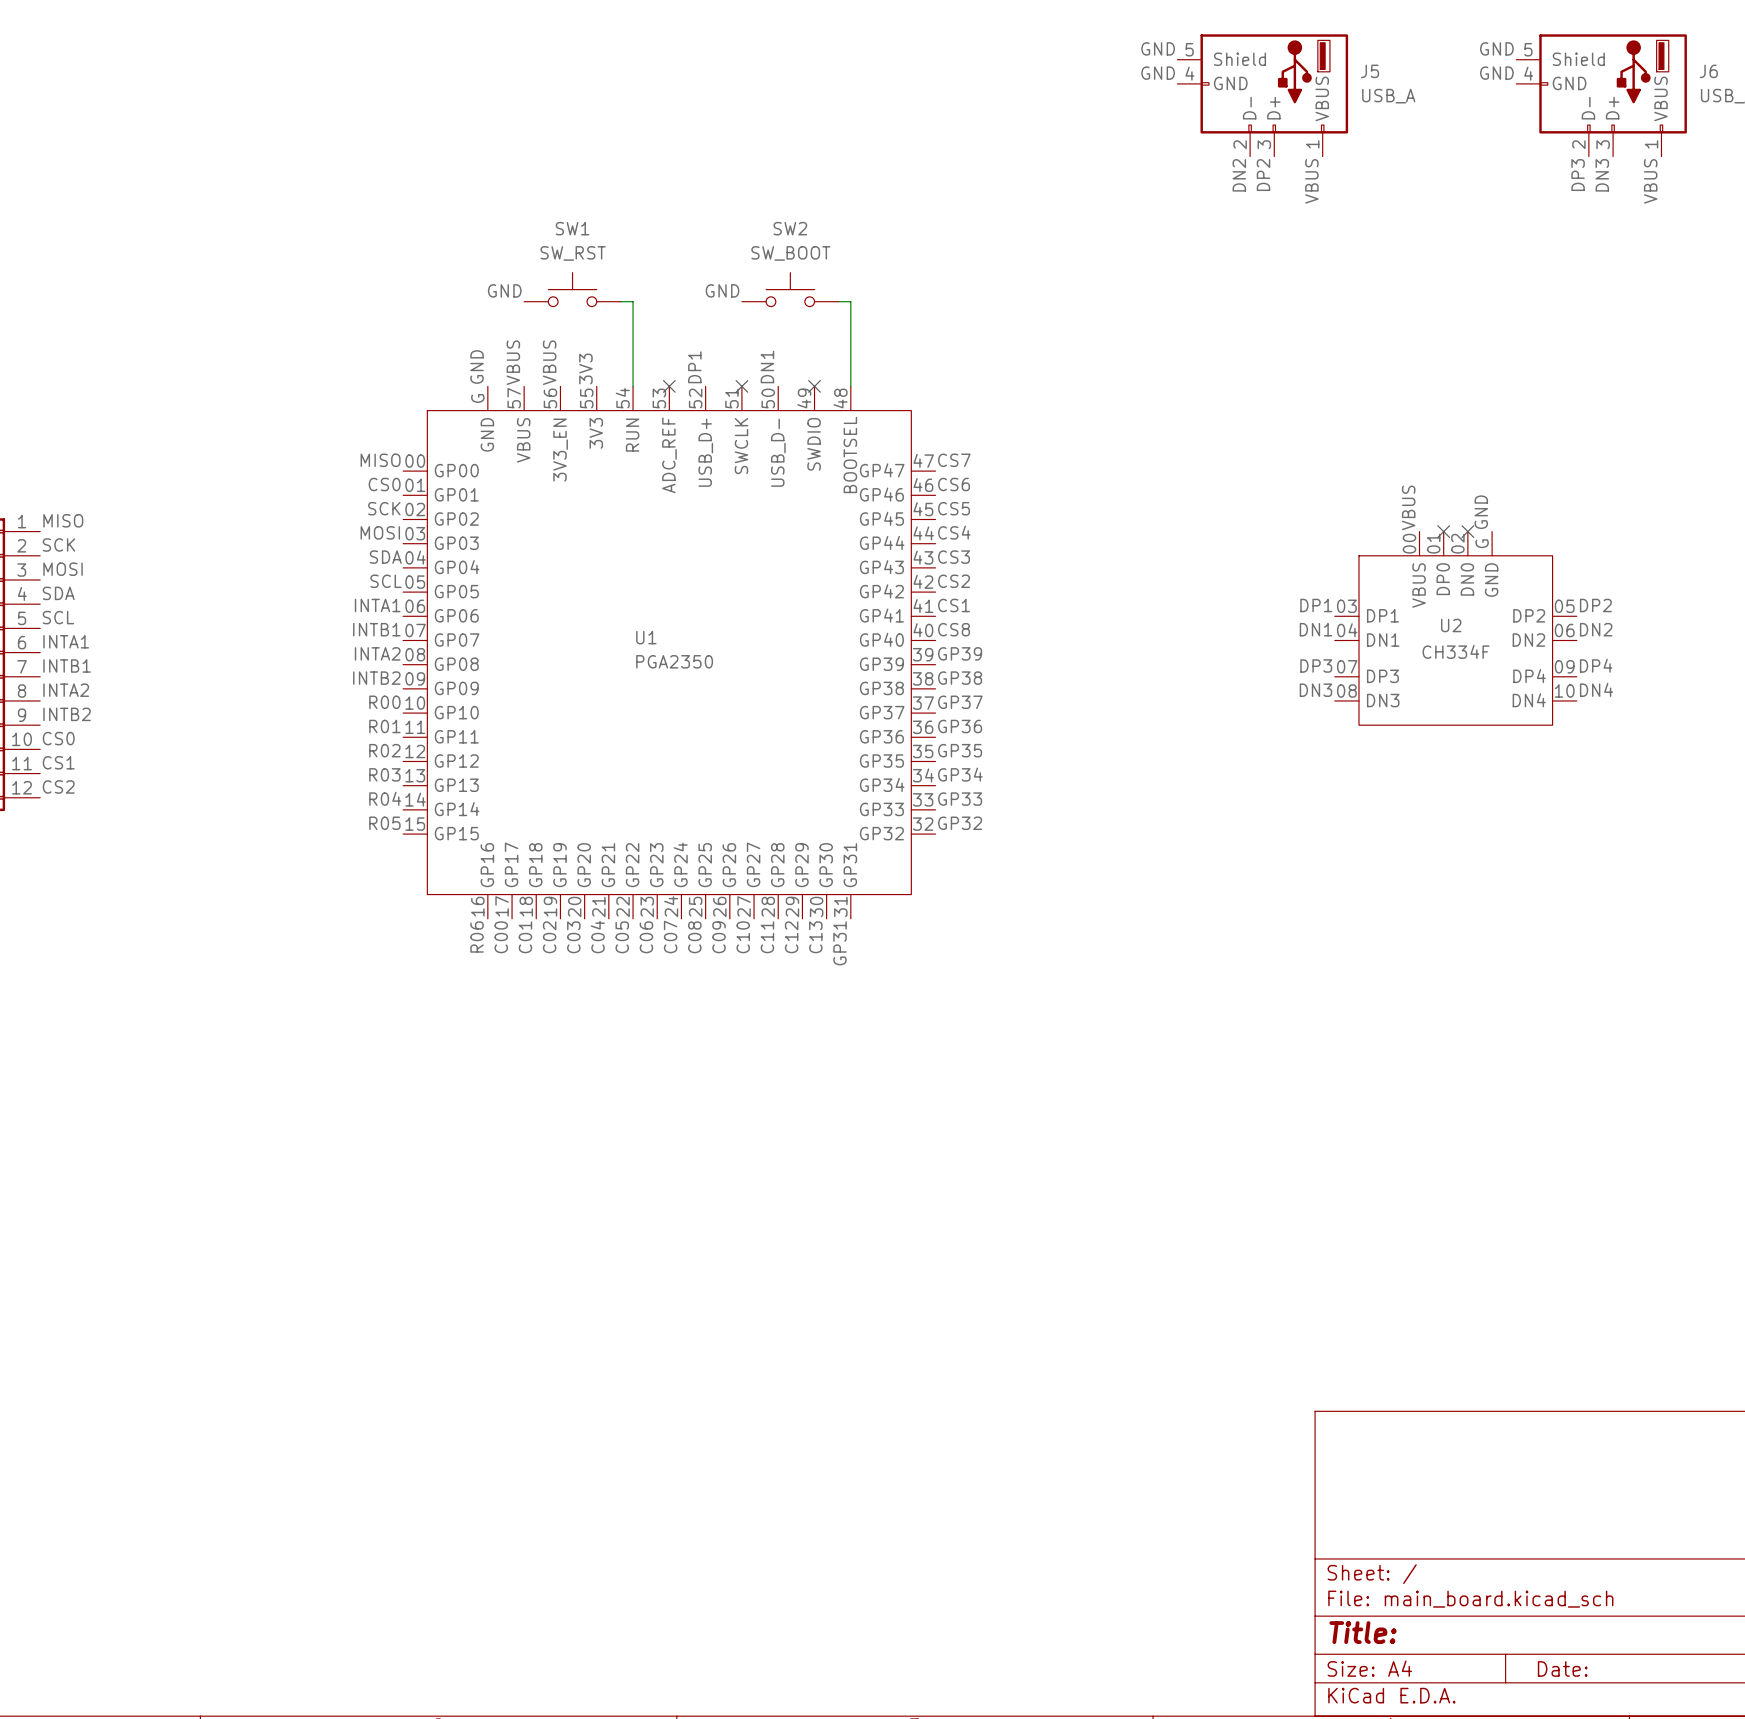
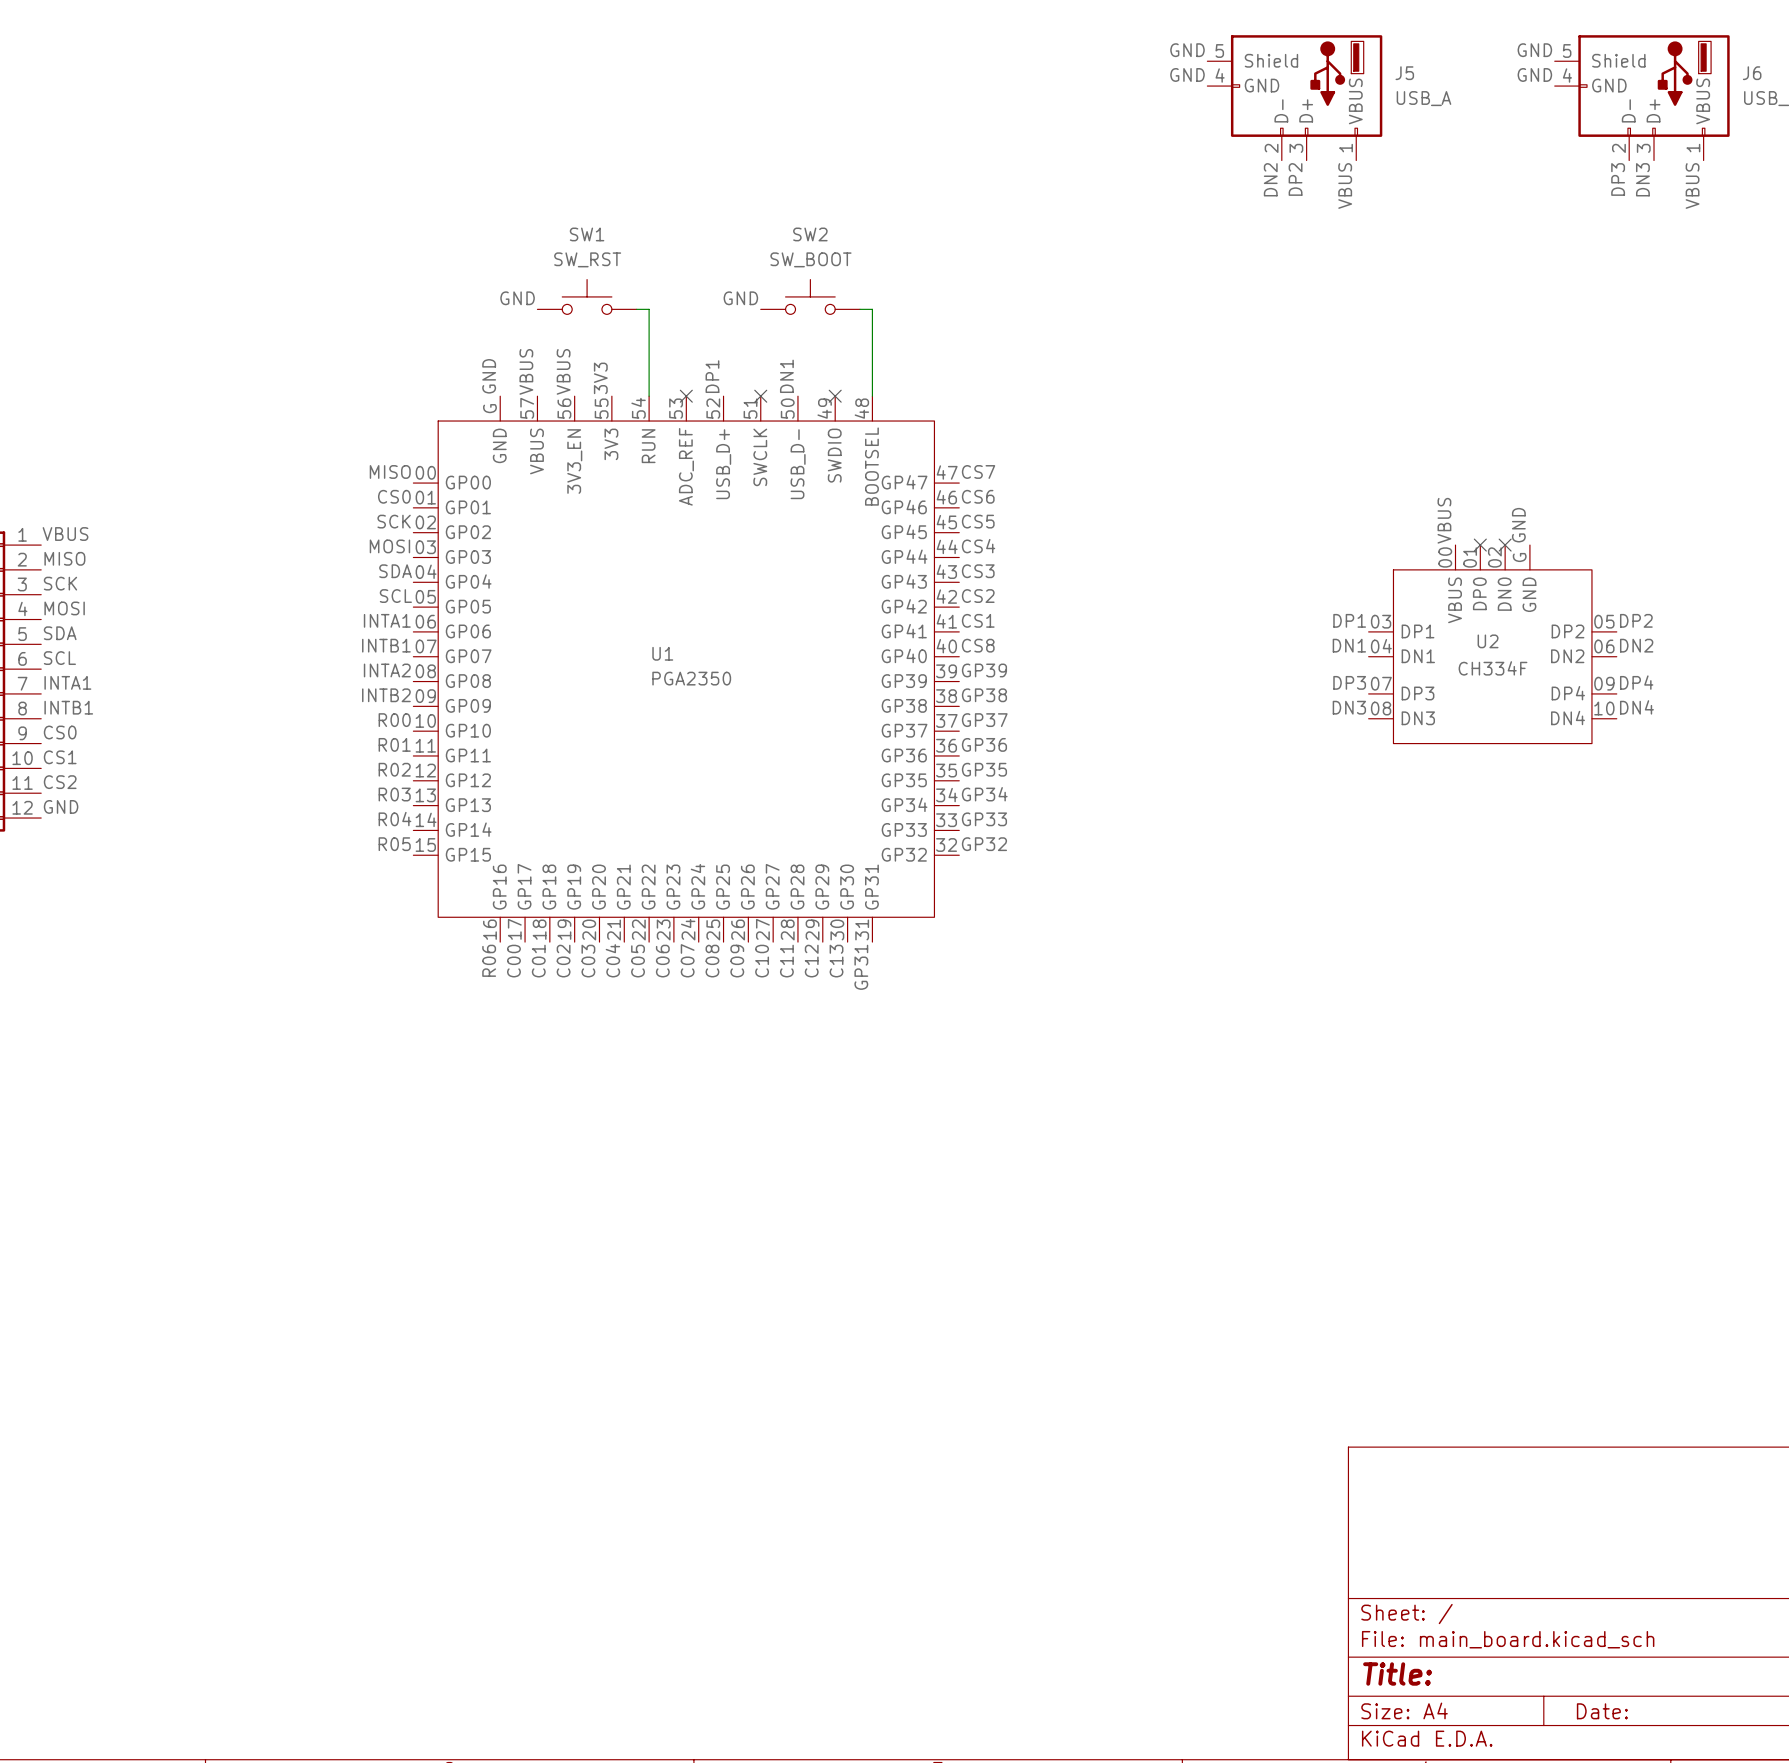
label: MISO (63, 520) -> VBUS (65, 534)
label: SCK (58, 544) -> MISO (64, 558)
label: MOSI (63, 569) -> SCK (60, 583)
label: SDA (58, 593) -> MOSI (64, 608)
label: SCL (58, 617) -> SDA (60, 633)
label: INTA1 (66, 641) -> SCL (59, 658)
label: INTB1 (67, 665) -> INTA1 (67, 682)
label: INTA2 (66, 690) -> INTB1 (68, 707)
label: INTB2 (67, 714) -> CS0 (60, 732)
label: CS0 (58, 738) -> CS1 (60, 757)
label: CS1 (58, 762) -> CS2 (60, 782)
label: CS2 (58, 786) -> GND (61, 806)

